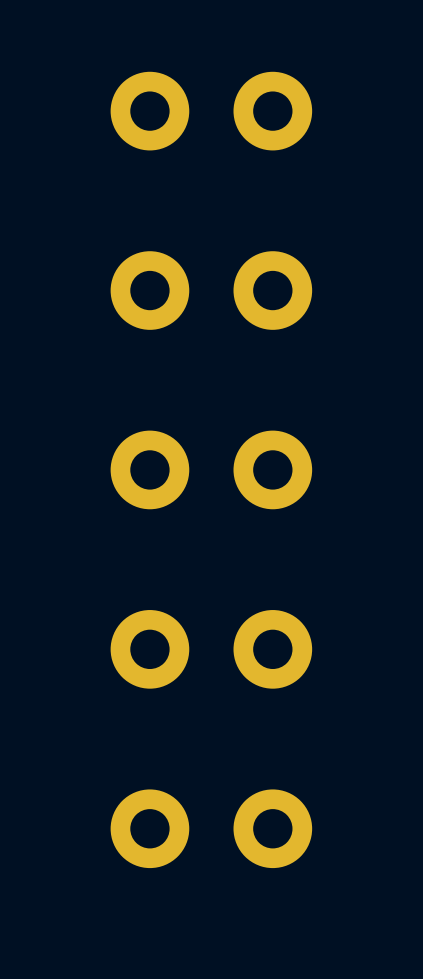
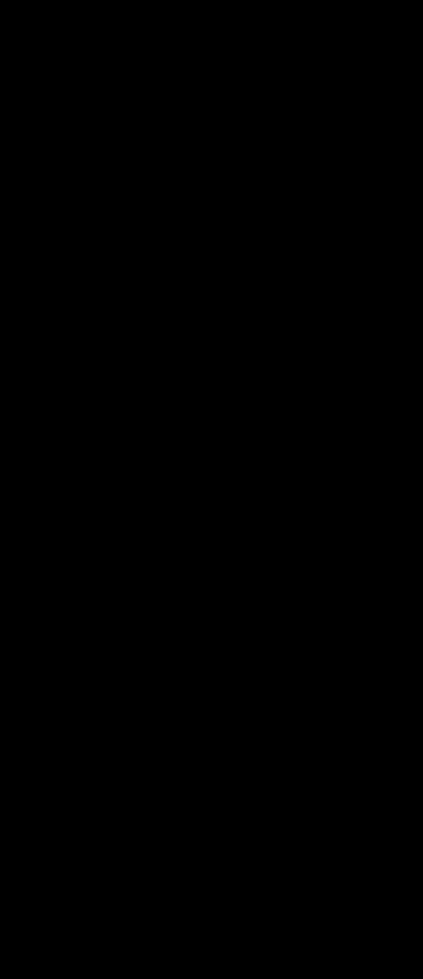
part: (211, 111) -> none
part: (211, 290) -> none
part: (211, 469) -> none
part: (211, 649) -> none
part: (211, 828) -> none

